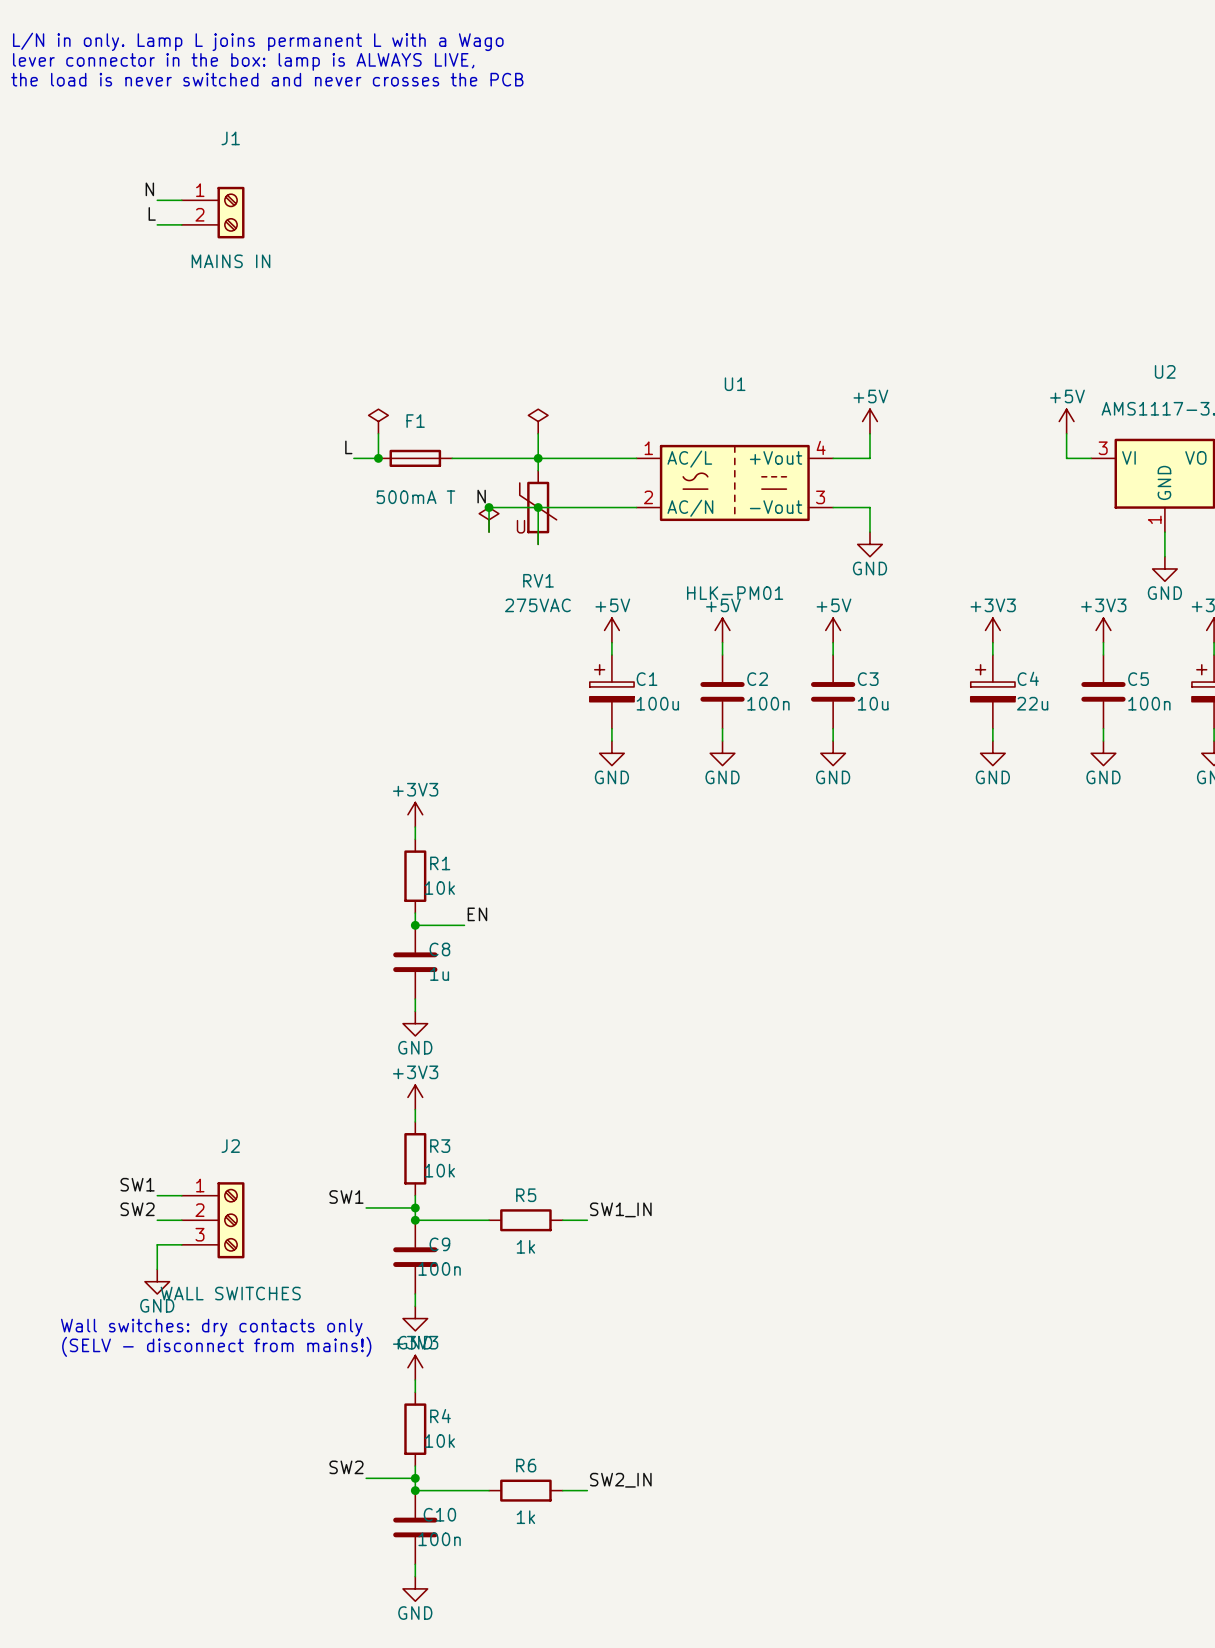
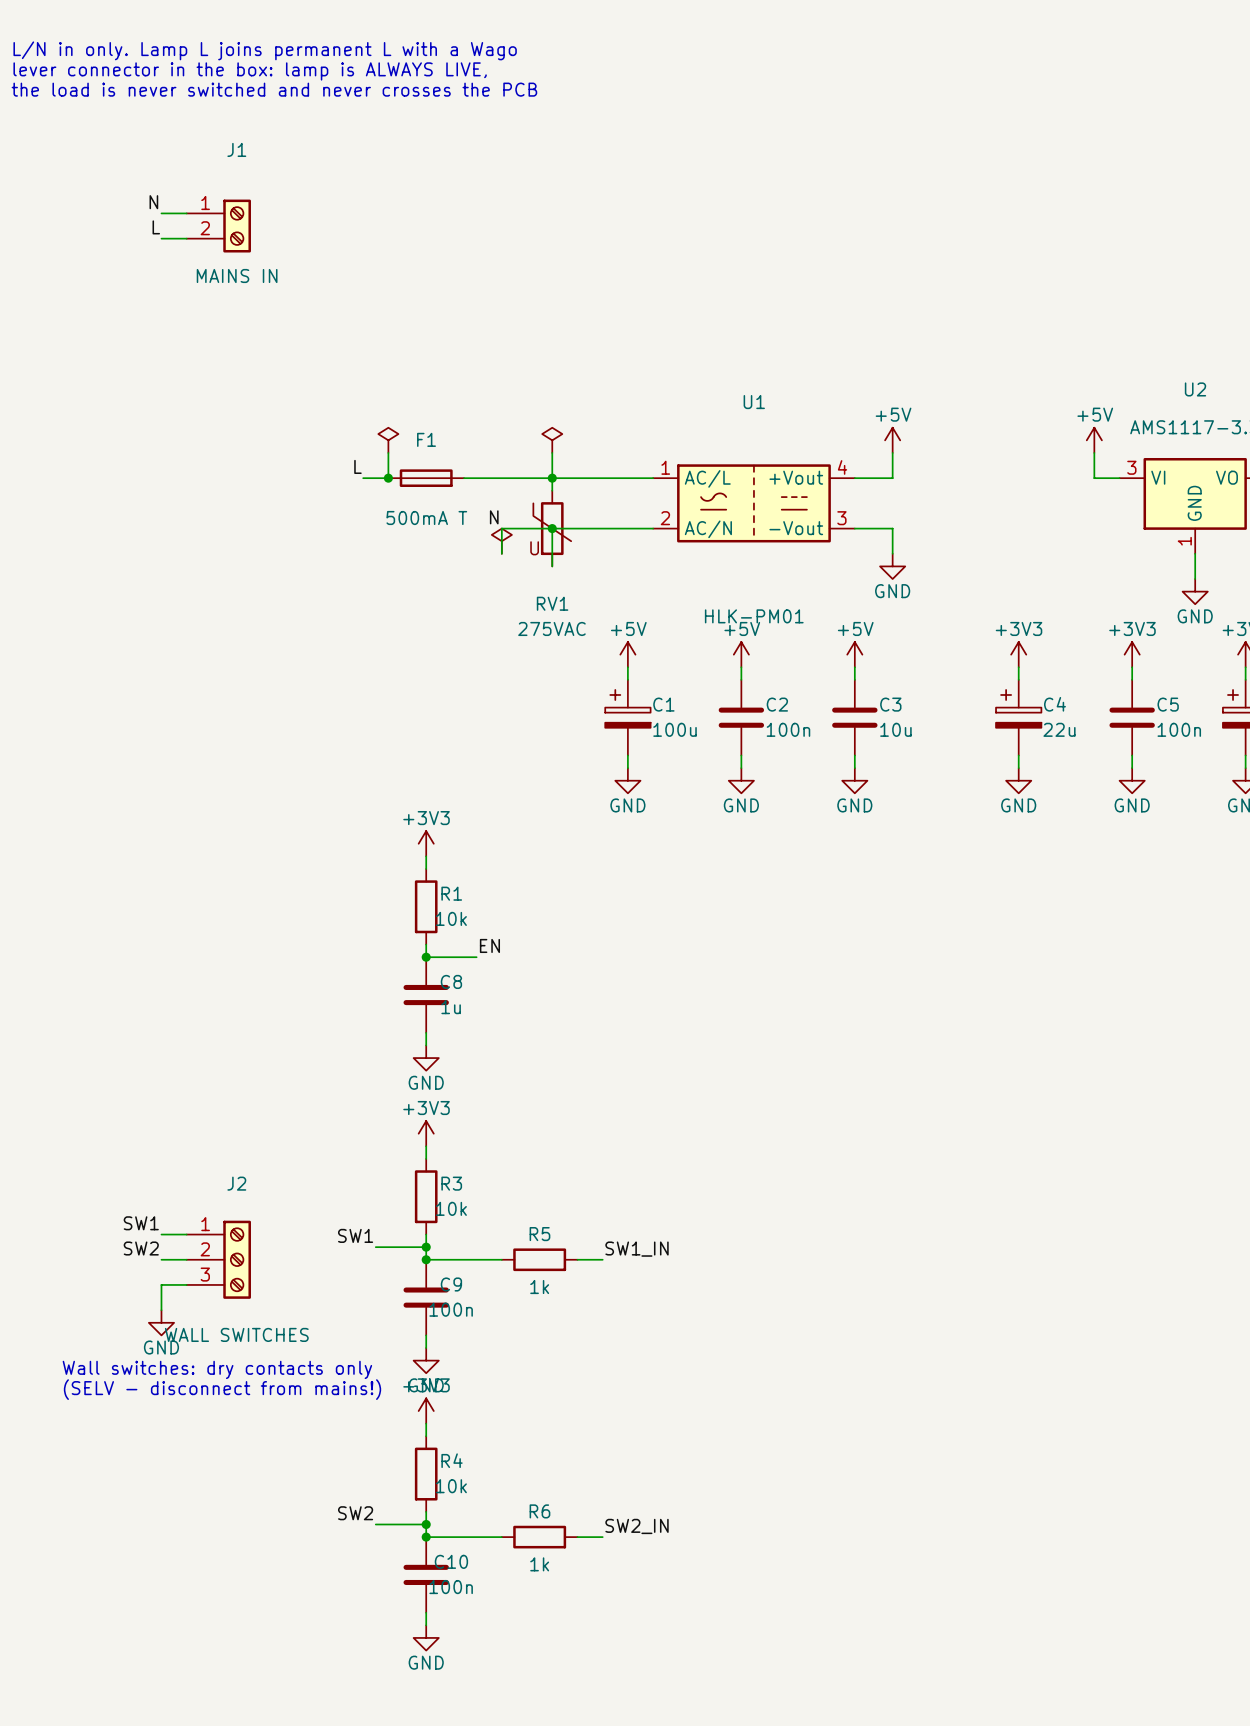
junction: (489, 507) -> none

